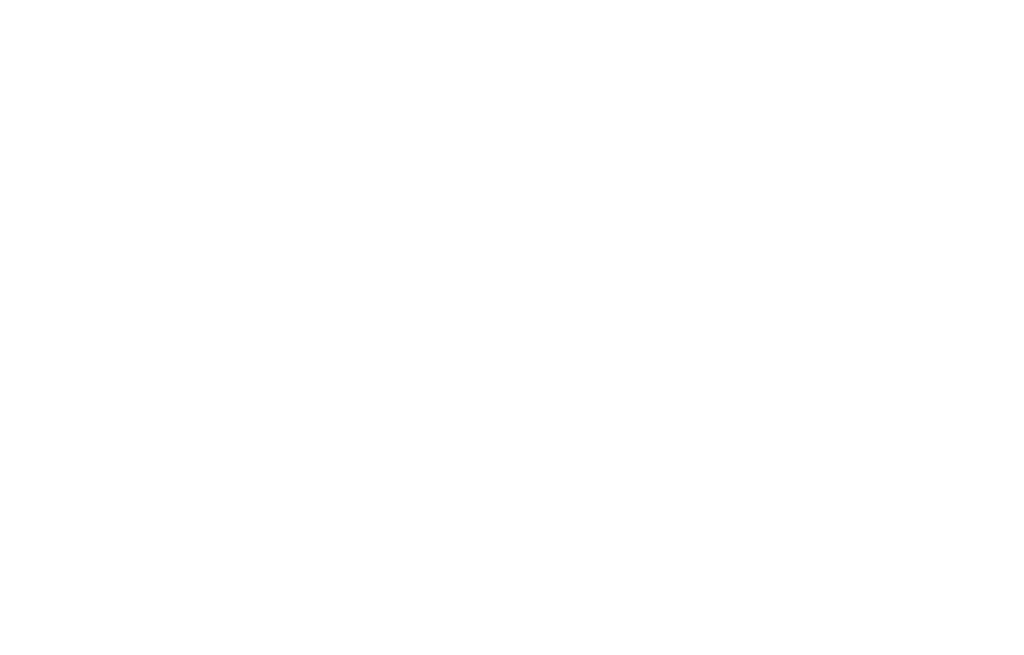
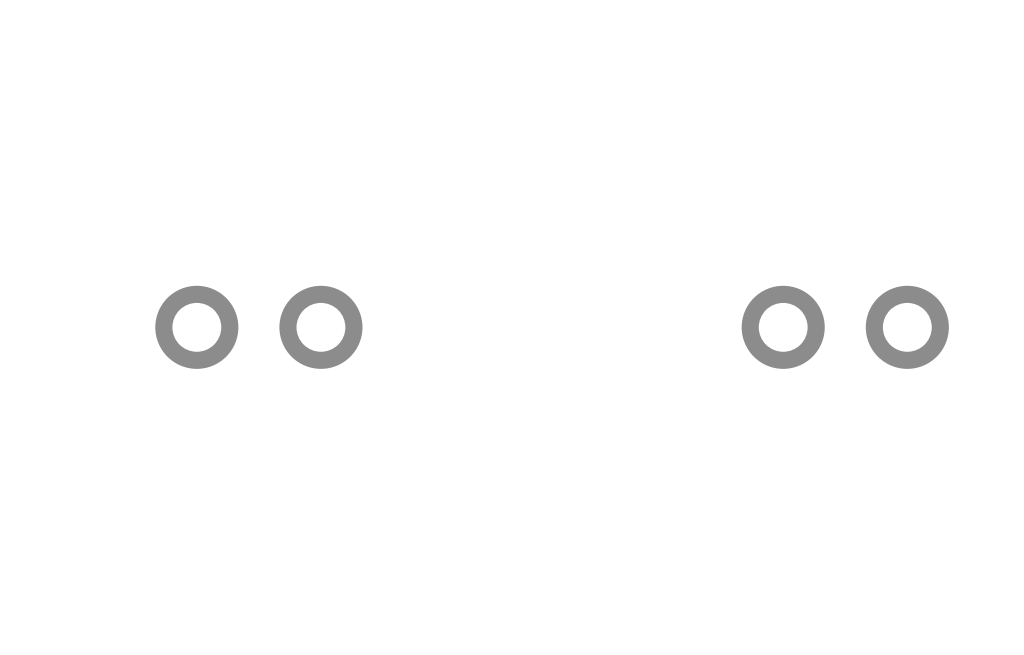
part: none -> (258, 327)
part: none -> (845, 327)

